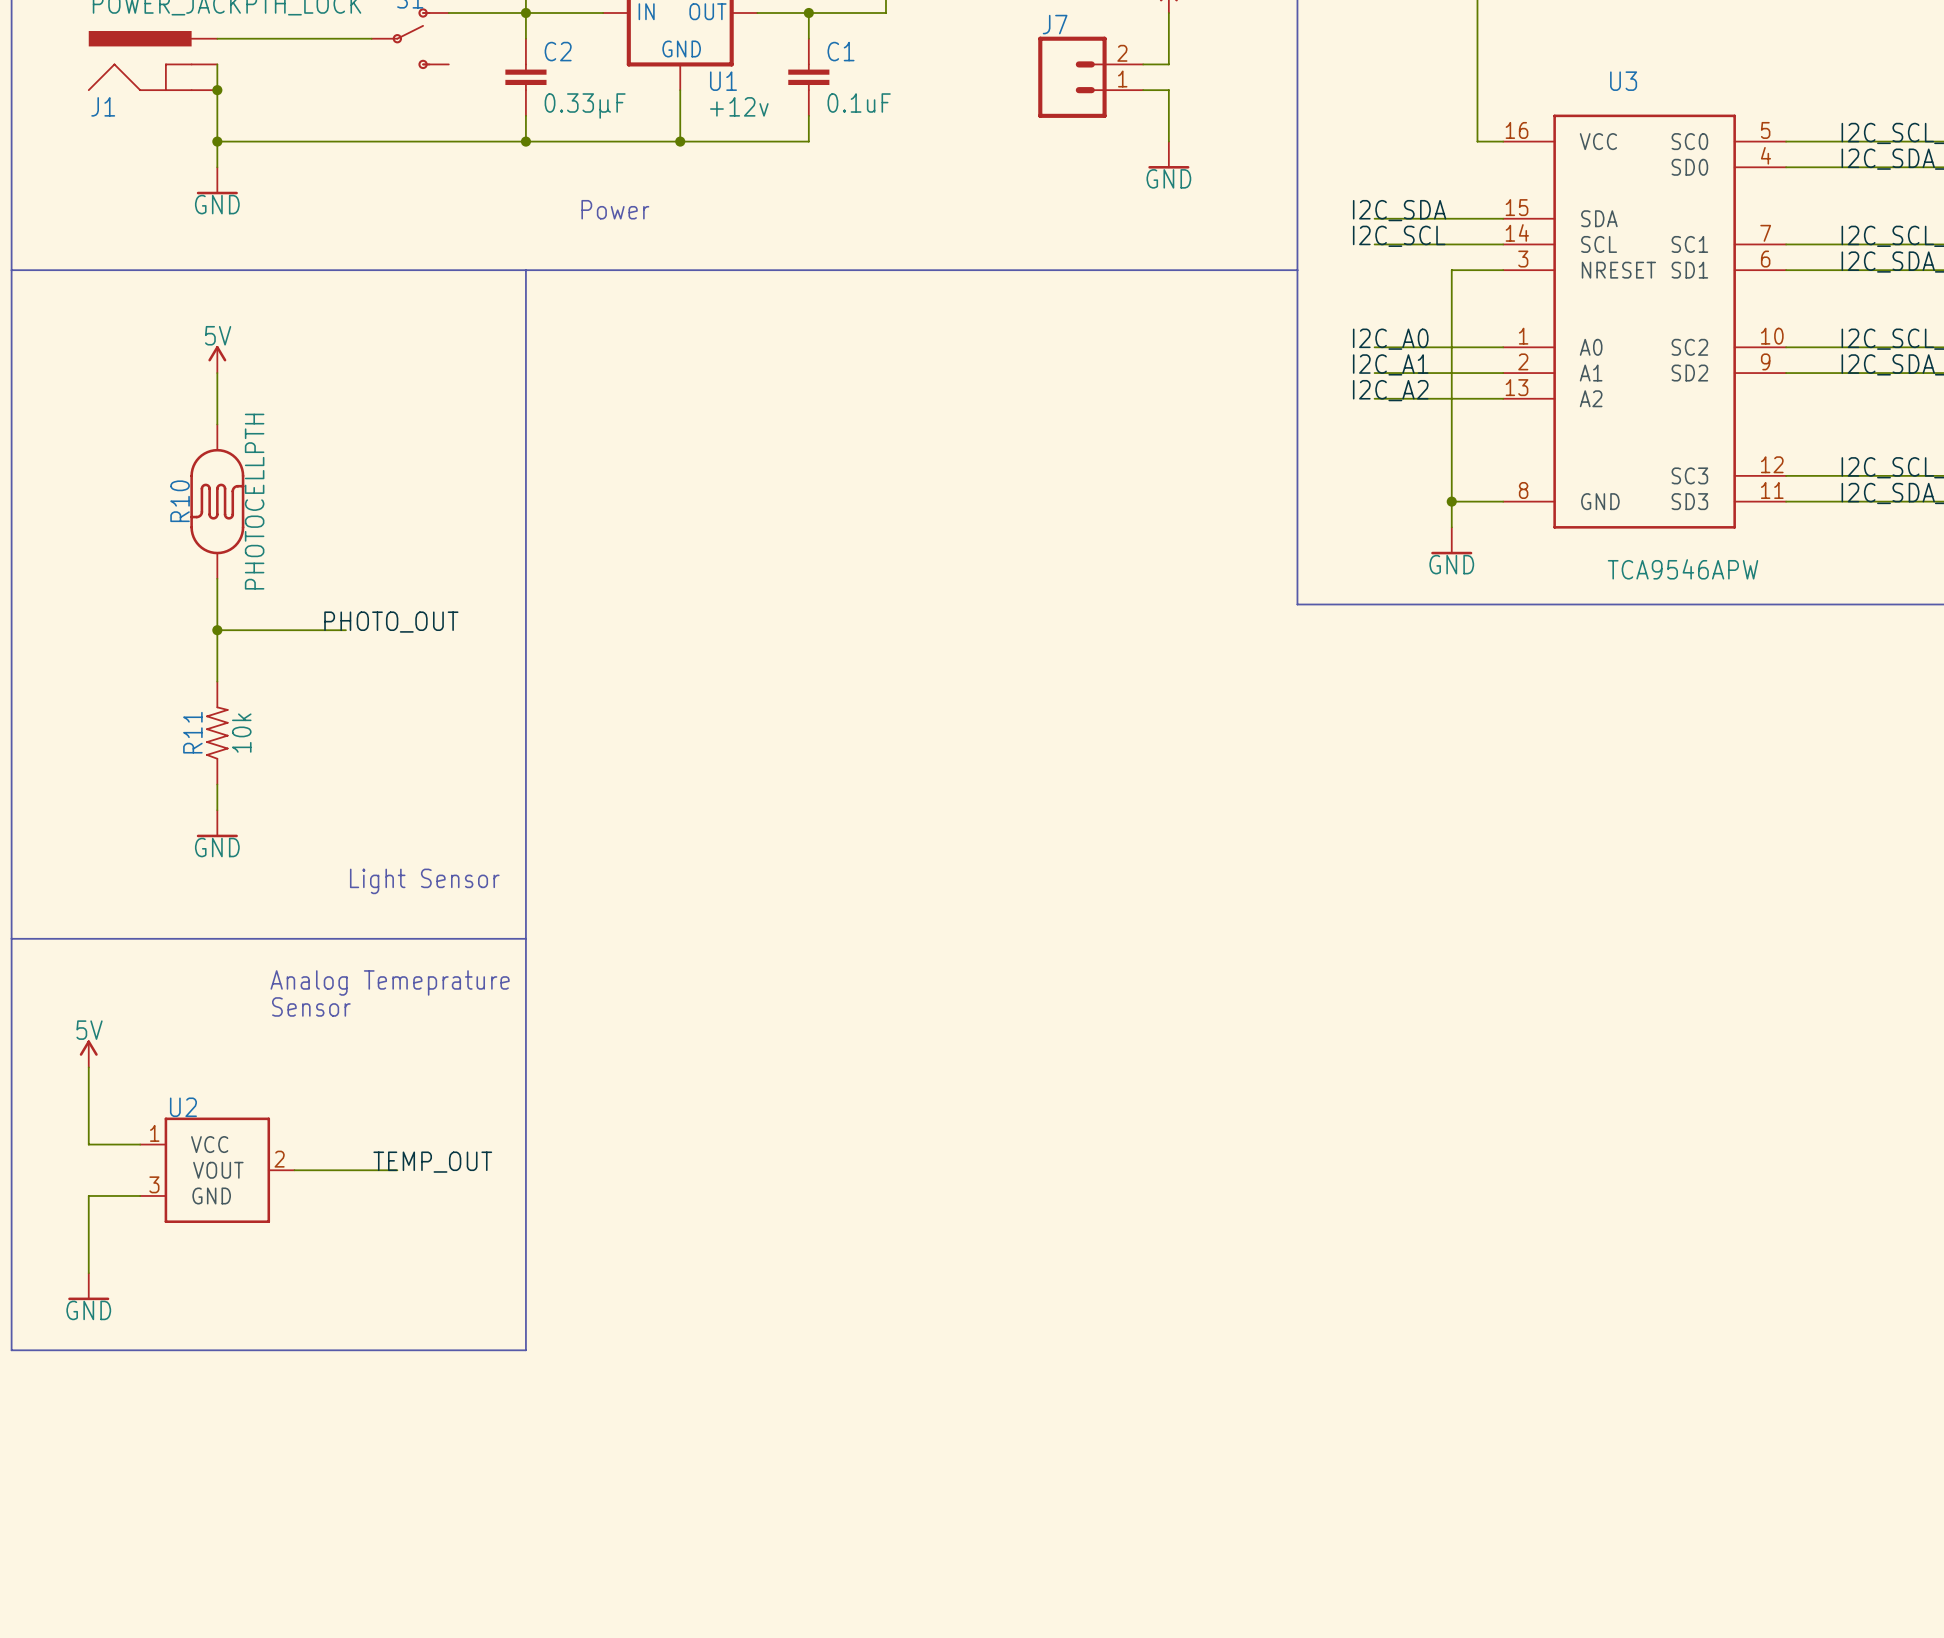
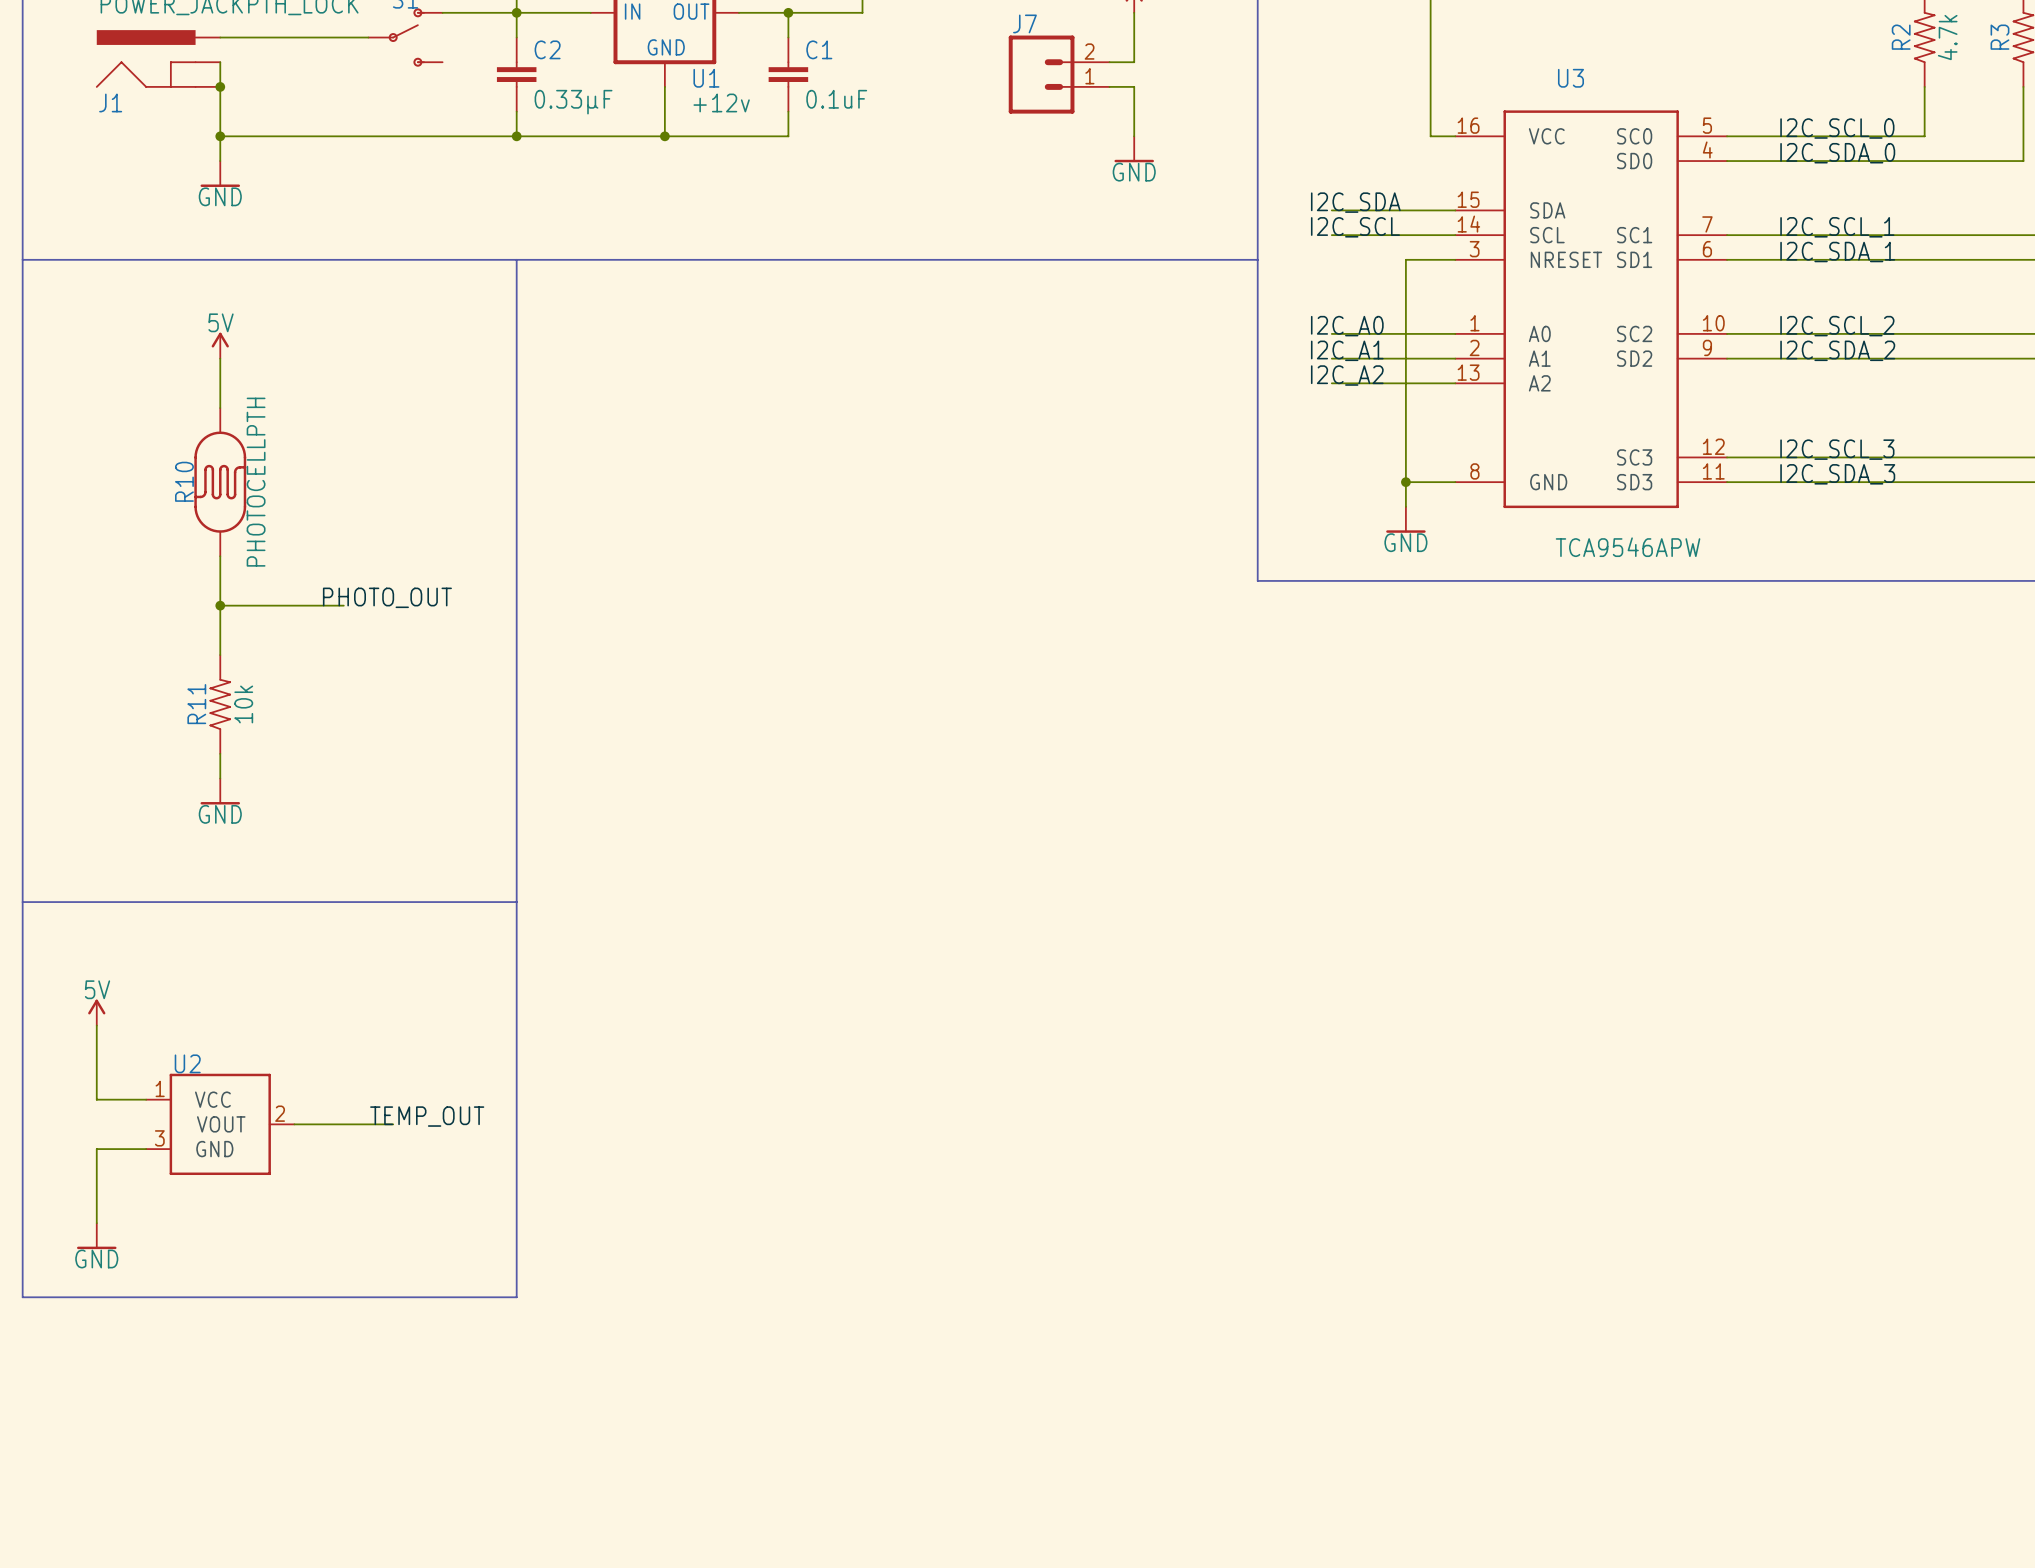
text: Power (615, 209) -> none
text: Light Sensor (424, 881) -> none
text: Analog Temeprature (390, 982) -> none
text: Sensor (311, 1006) -> none

